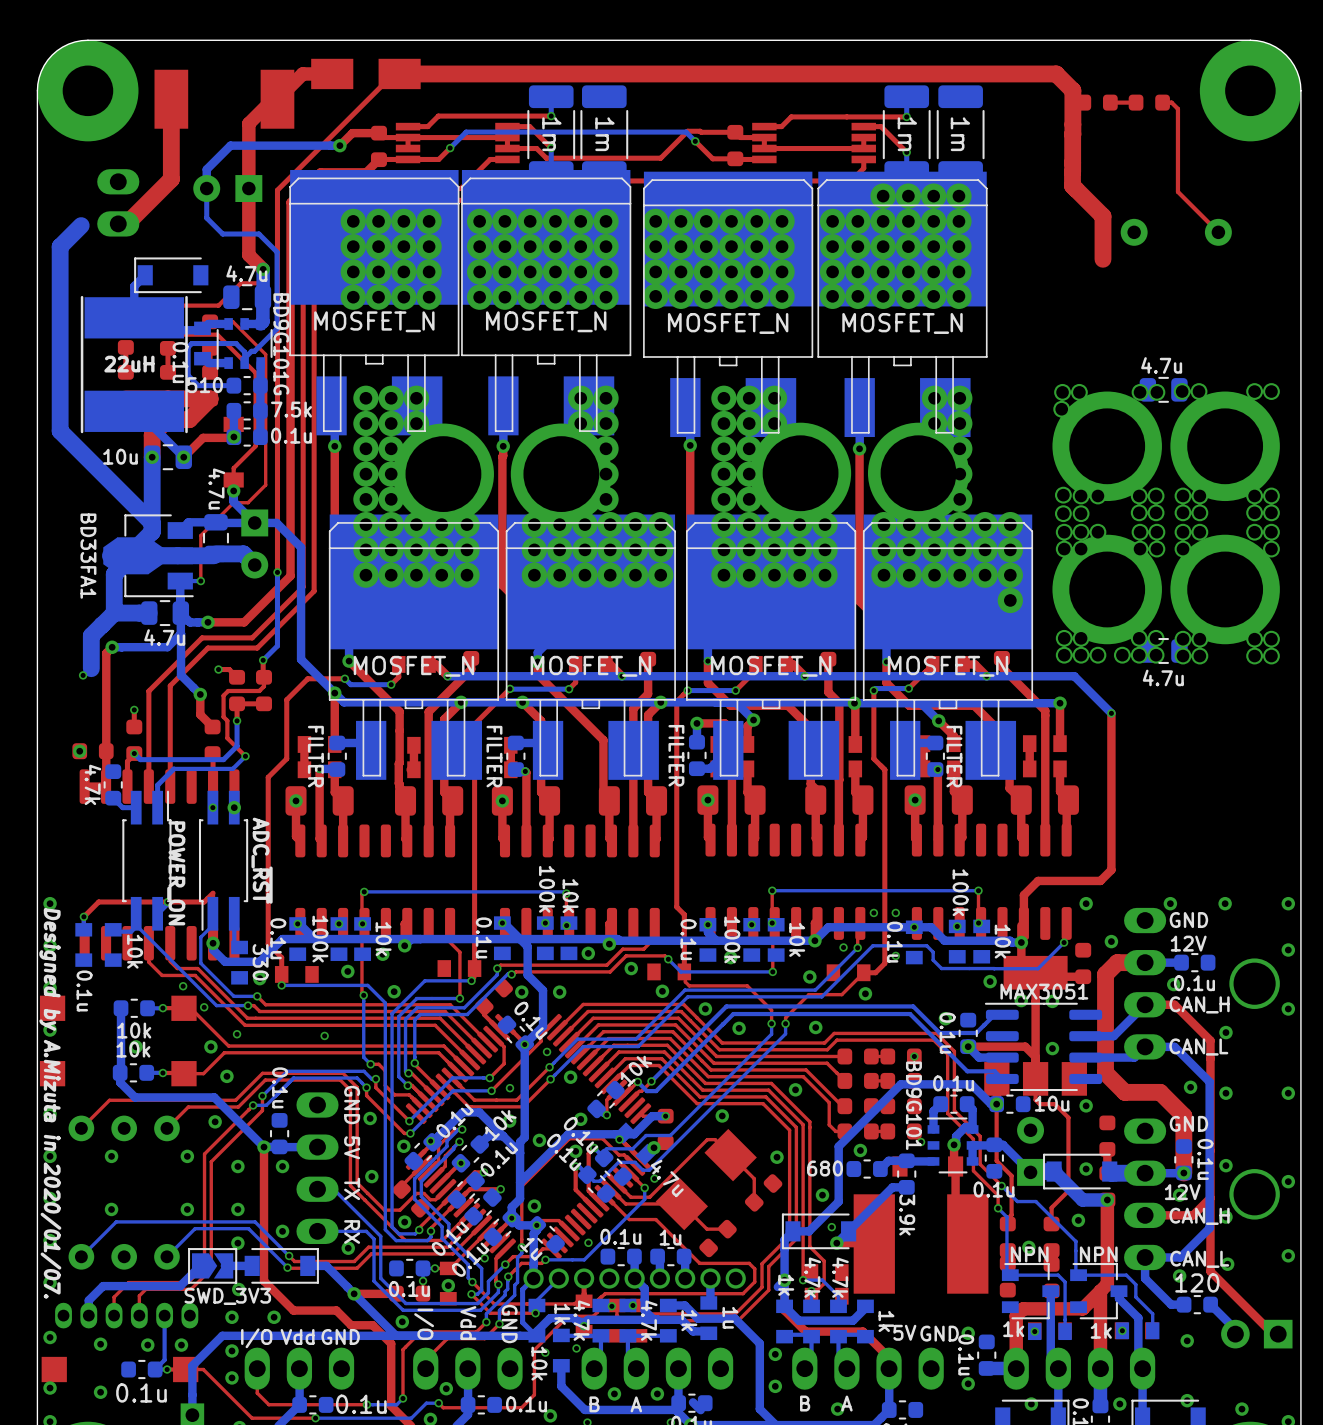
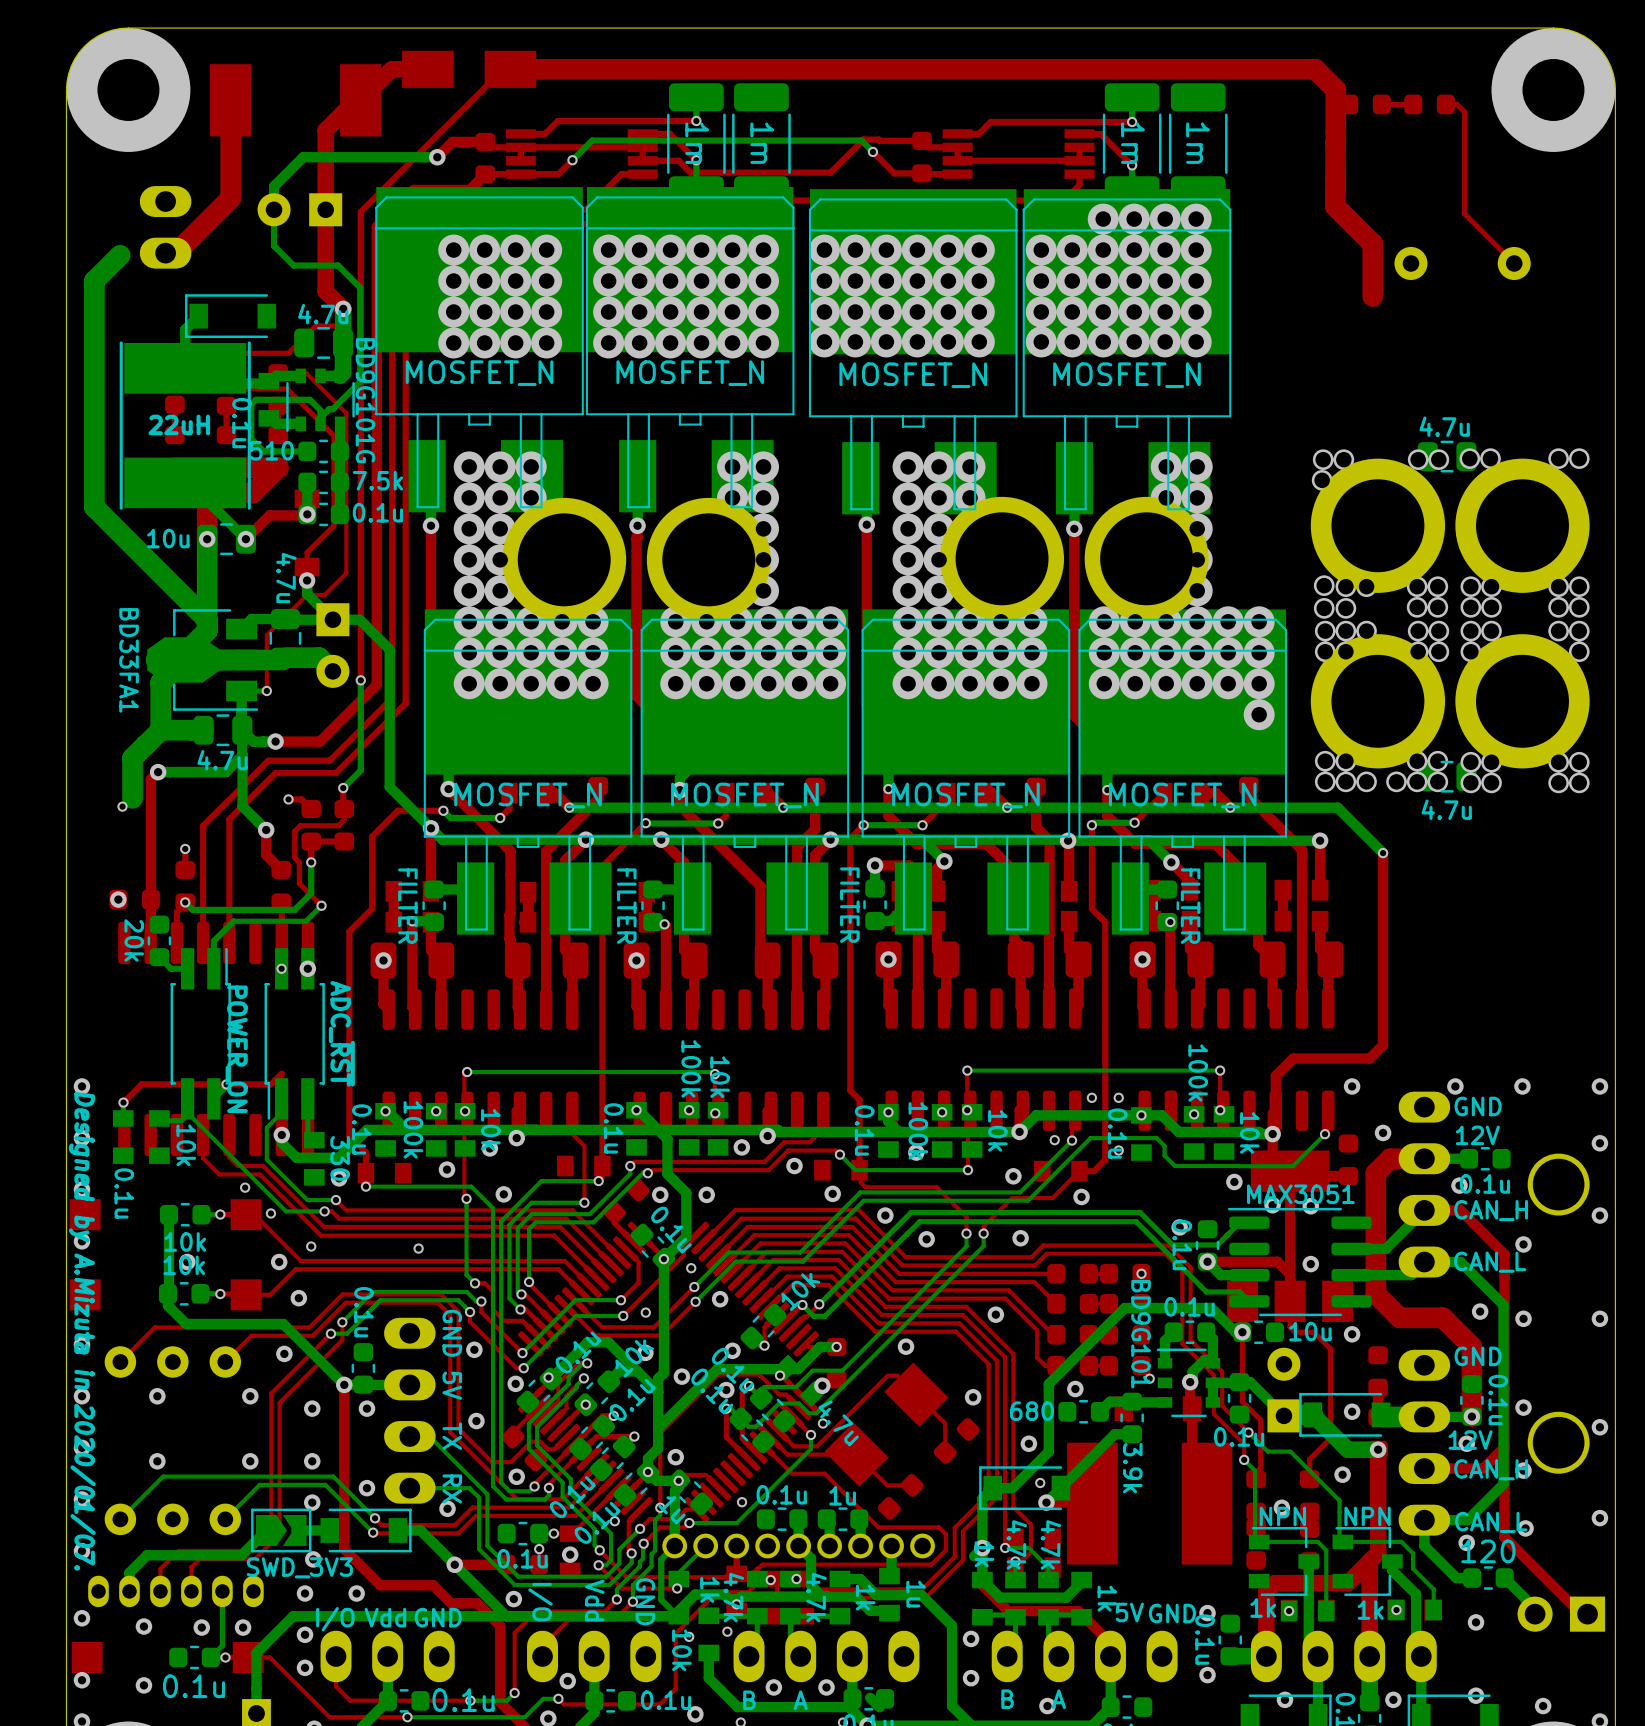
part value: 4.7k (92, 784) -> 20k (134, 940)

